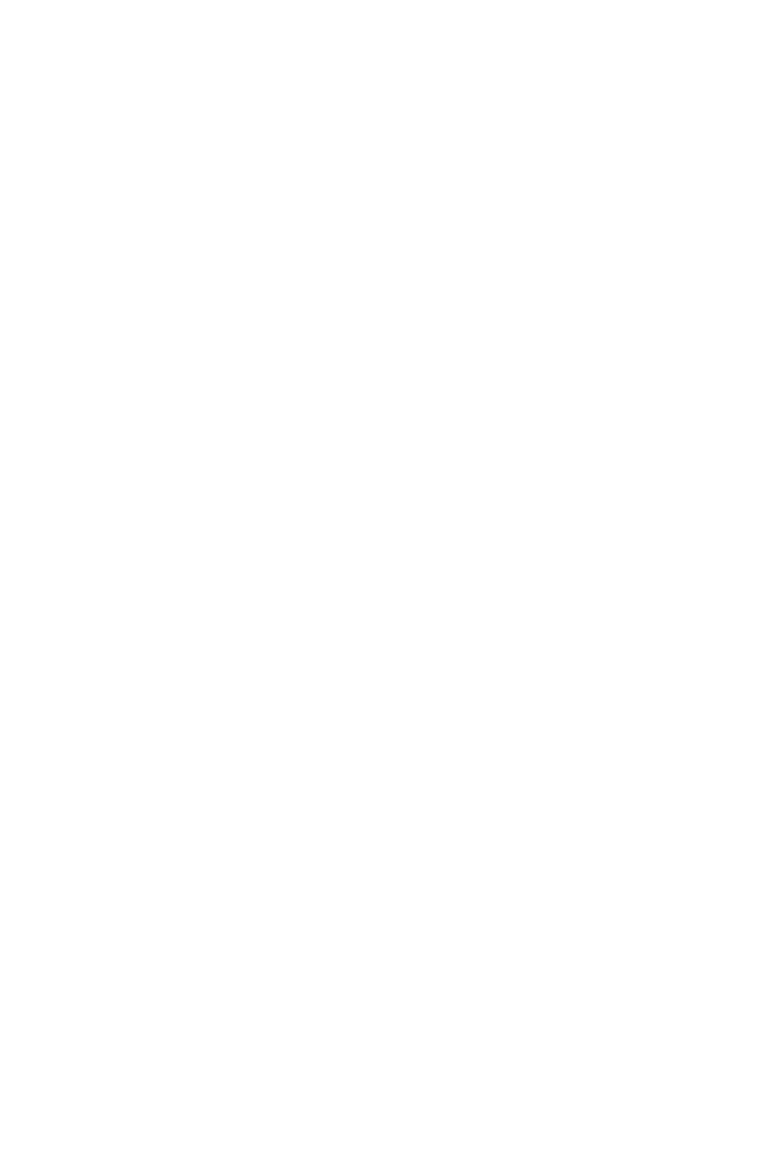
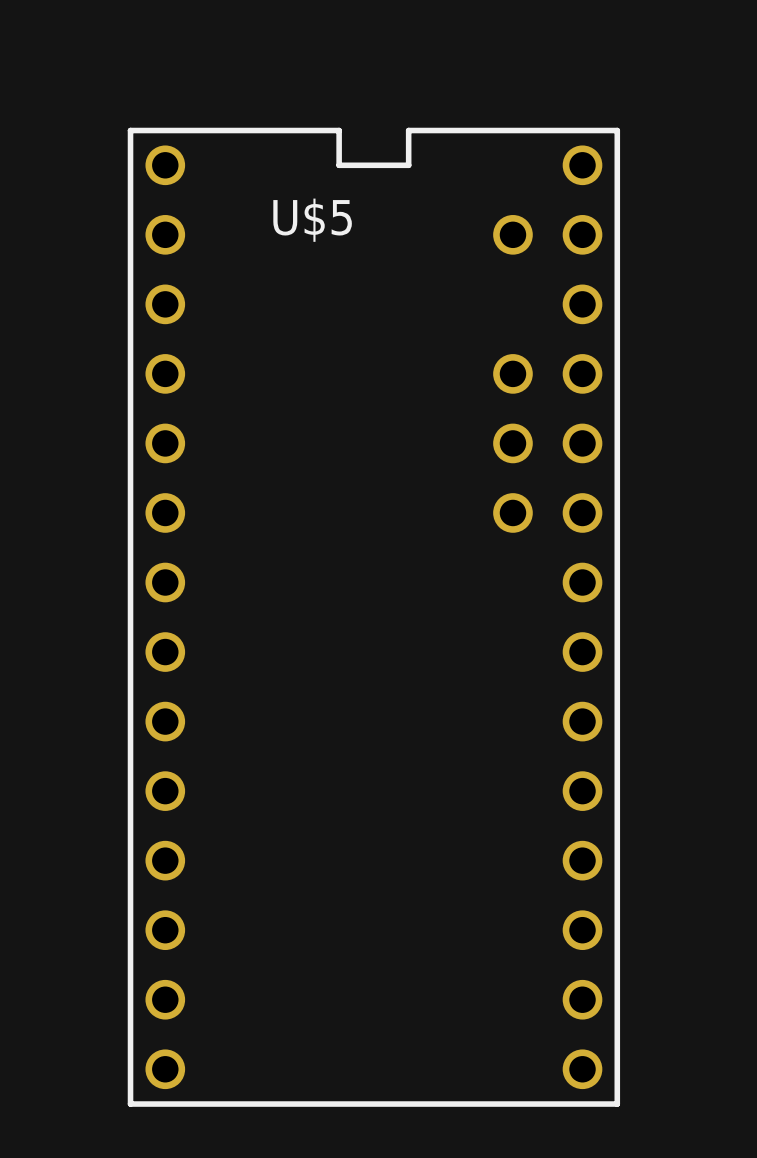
U$5: none -> (373, 617)

